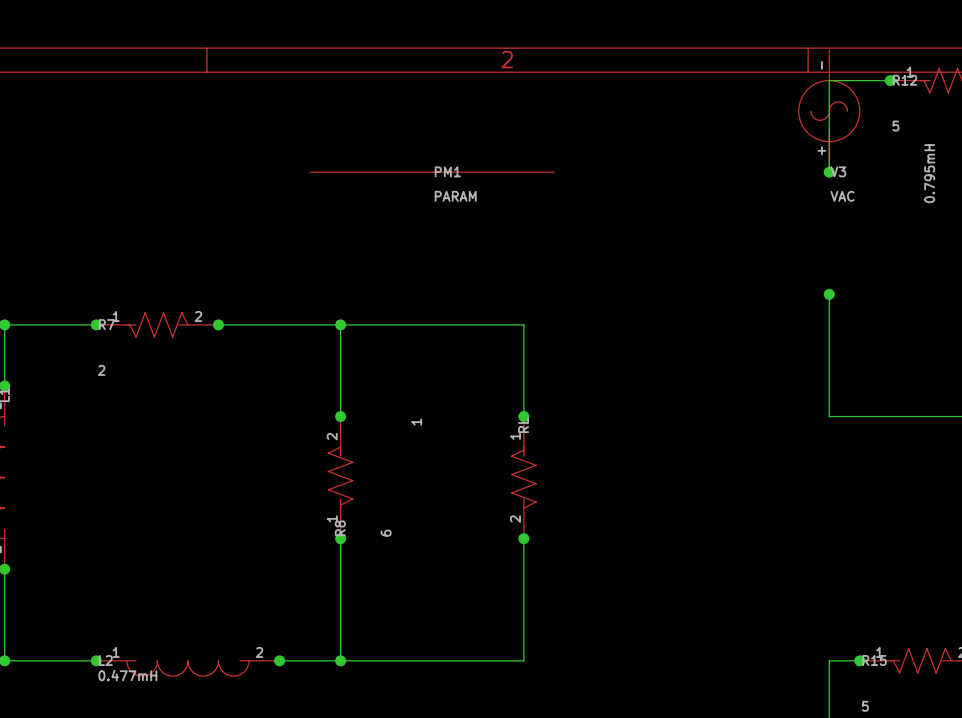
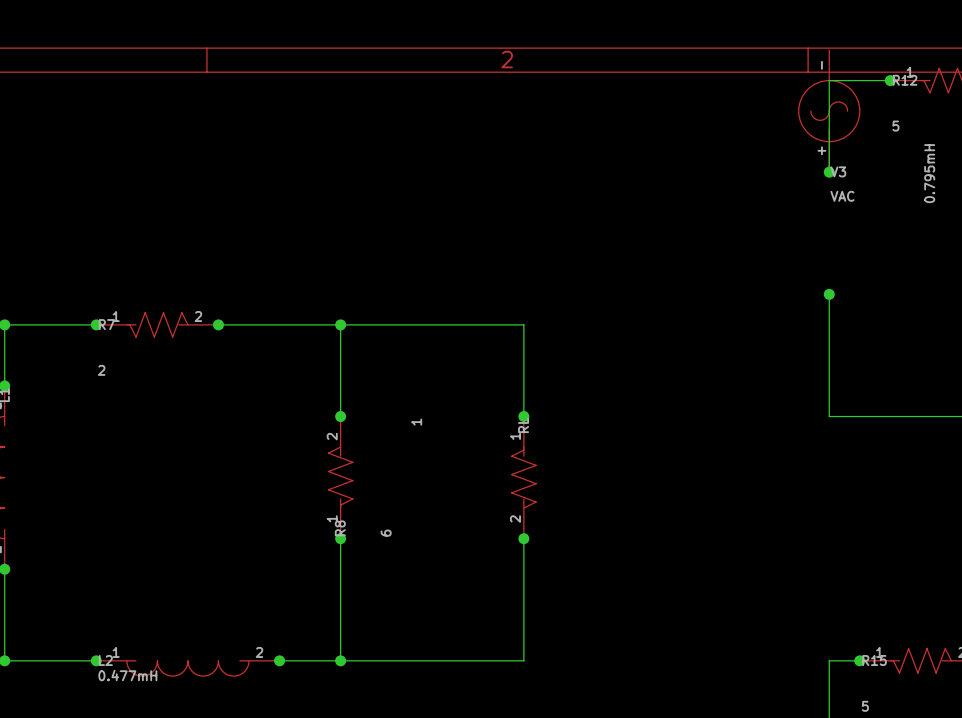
PM1: PARAM (432, 172) -> none

